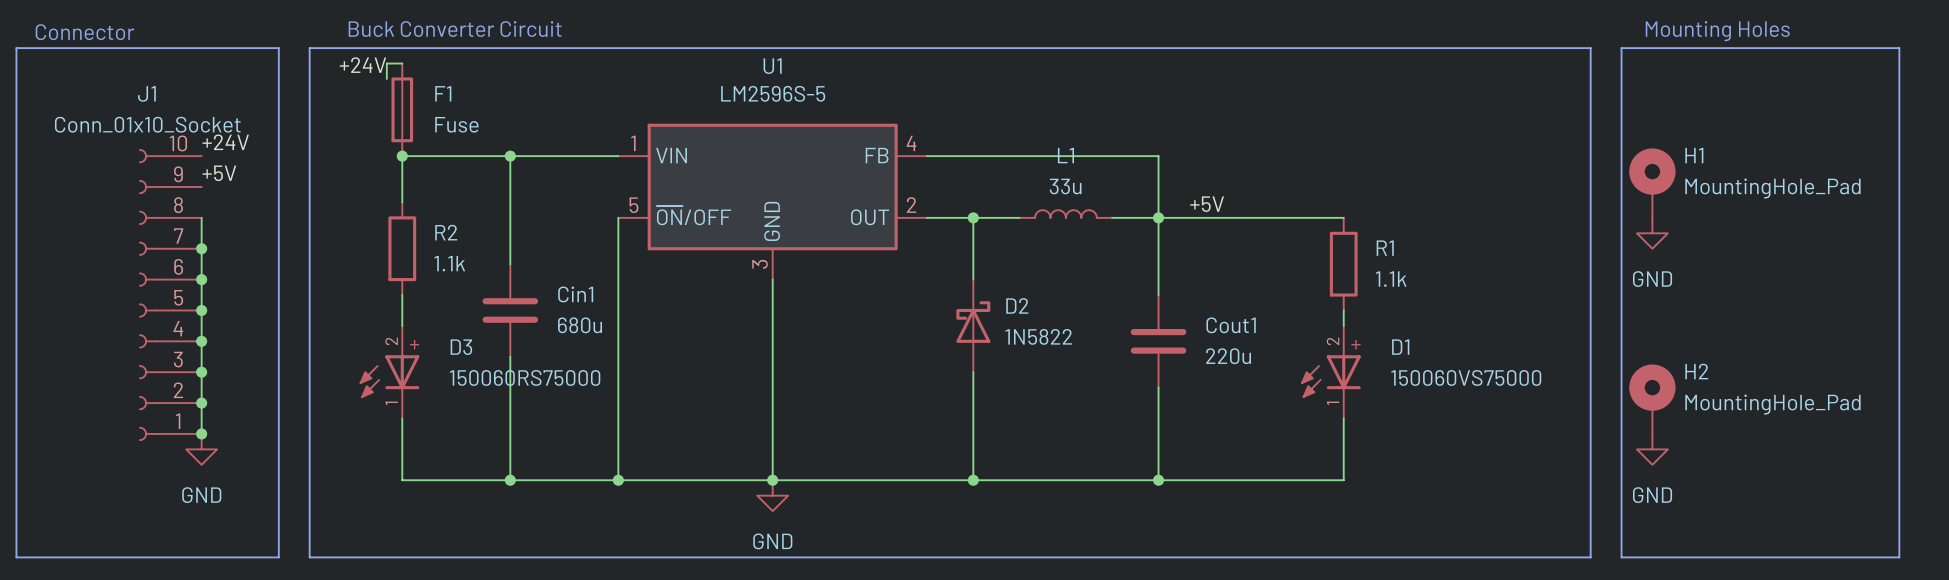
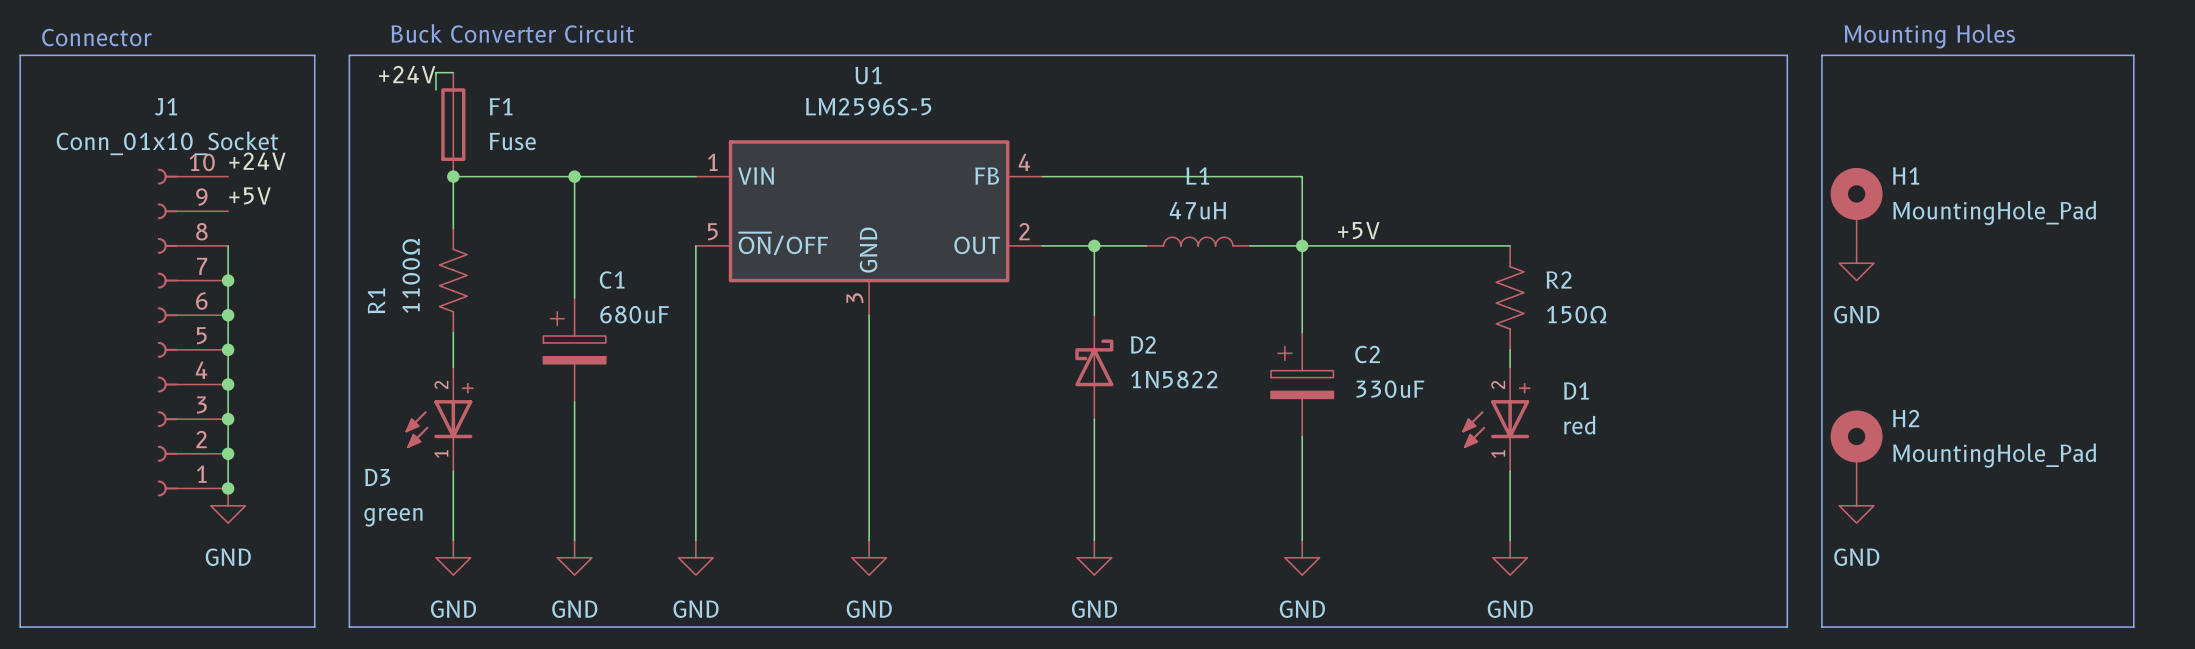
L1 value: 33u (1065, 186) -> 47uH (1197, 210)
R2 symbol: [388, 202, 417, 296] -> [1496, 245, 1524, 350]
R1 symbol: [1329, 217, 1358, 311] -> [439, 228, 468, 333]
R1 name position: R1 (1385, 248) -> R1 (376, 300)
R2 value: 1.1k (449, 263) -> 150Ω (1576, 314)
R1 value: 1.1k (1391, 279) -> 1100Ω (411, 275)
Cin1: 680u (510, 310) -> none
C1: none -> 680uF (574, 349)
Cout1: 220u (1158, 341) -> none
C2: none -> 330uF (1302, 384)
D3 name position: D3 (461, 347) -> D3 (377, 477)
D3 value: 150060RS75000 (525, 377) -> green (393, 517)
D1 value: 150060VS75000 (1466, 377) -> red (1579, 425)
wire: (402, 480) (1343, 480) -> none
junction: (510, 480) -> none
junction: (618, 480) -> none
junction: (772, 480) -> none
junction: (973, 480) -> none
junction: (1158, 480) -> none
power symbol: none -> GND (453, 557)
power symbol: none -> GND (574, 557)
power symbol: none -> GND (695, 557)
power symbol: none -> GND (1094, 557)
power symbol: none -> GND (1302, 557)
power symbol: none -> GND (1510, 557)

